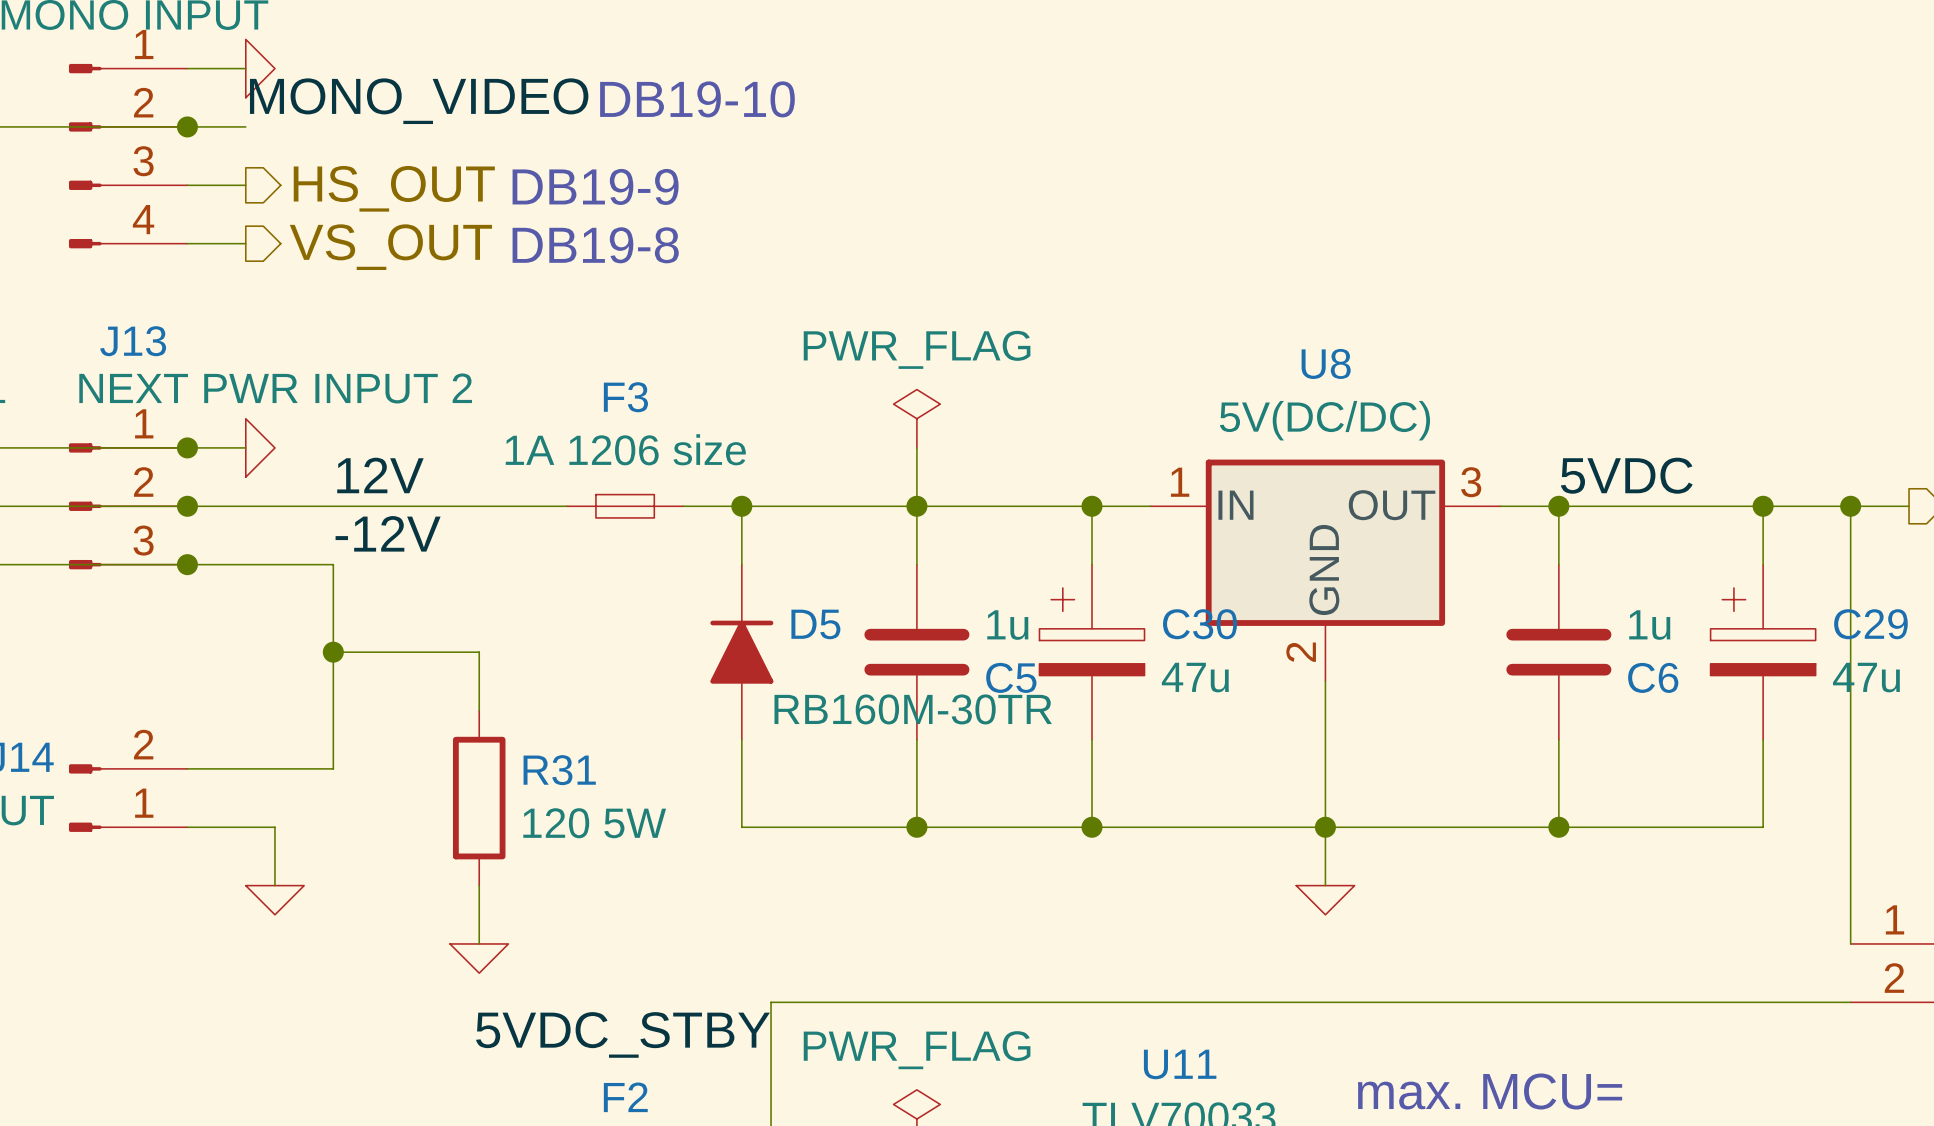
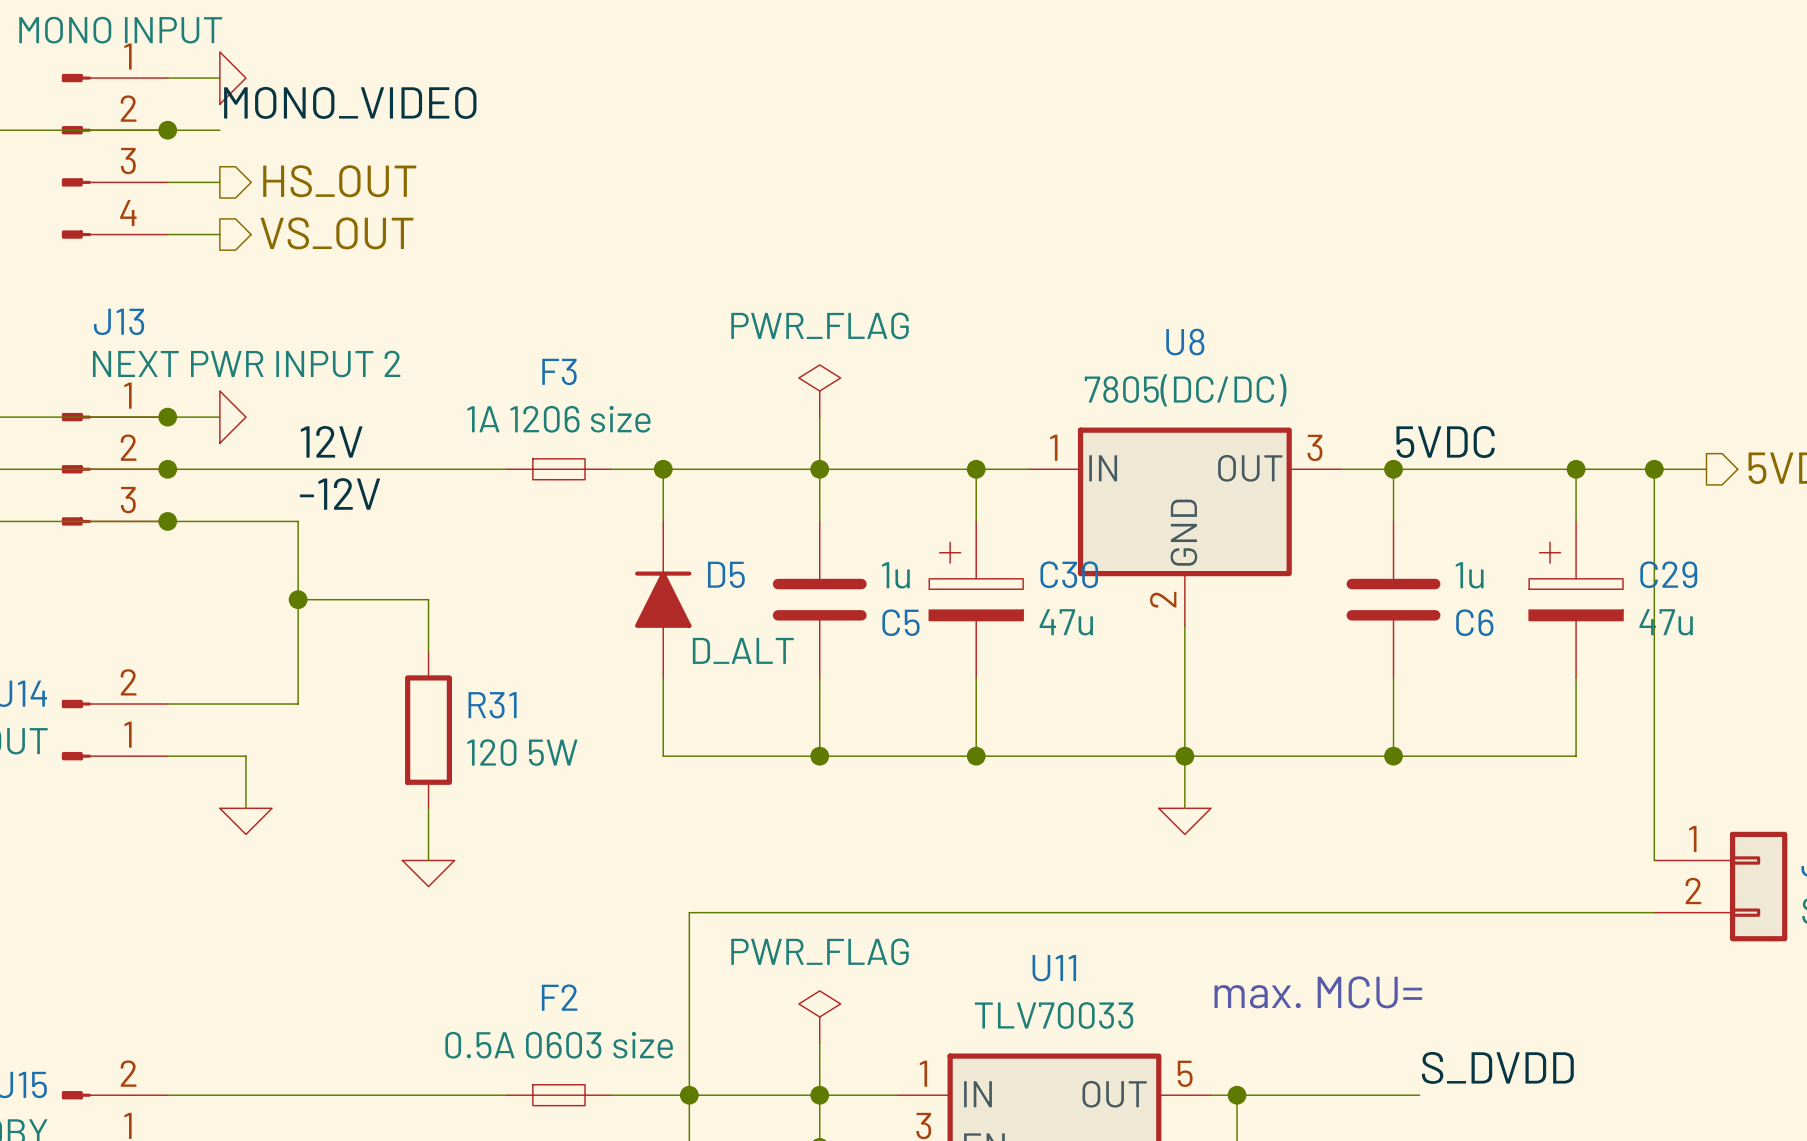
text: DB19-10 (697, 99) -> none
text: DB19-9 (595, 186) -> none
text: DB19-8 (595, 245) -> none
U8 value: 5V(DC/DC) (1324, 420) -> 7805(DC/DC) (1185, 390)
D5 value: RB160M-30TR (913, 709) -> D_ALT (743, 650)
label: 5VDC_STBY (622, 1034) -> none

